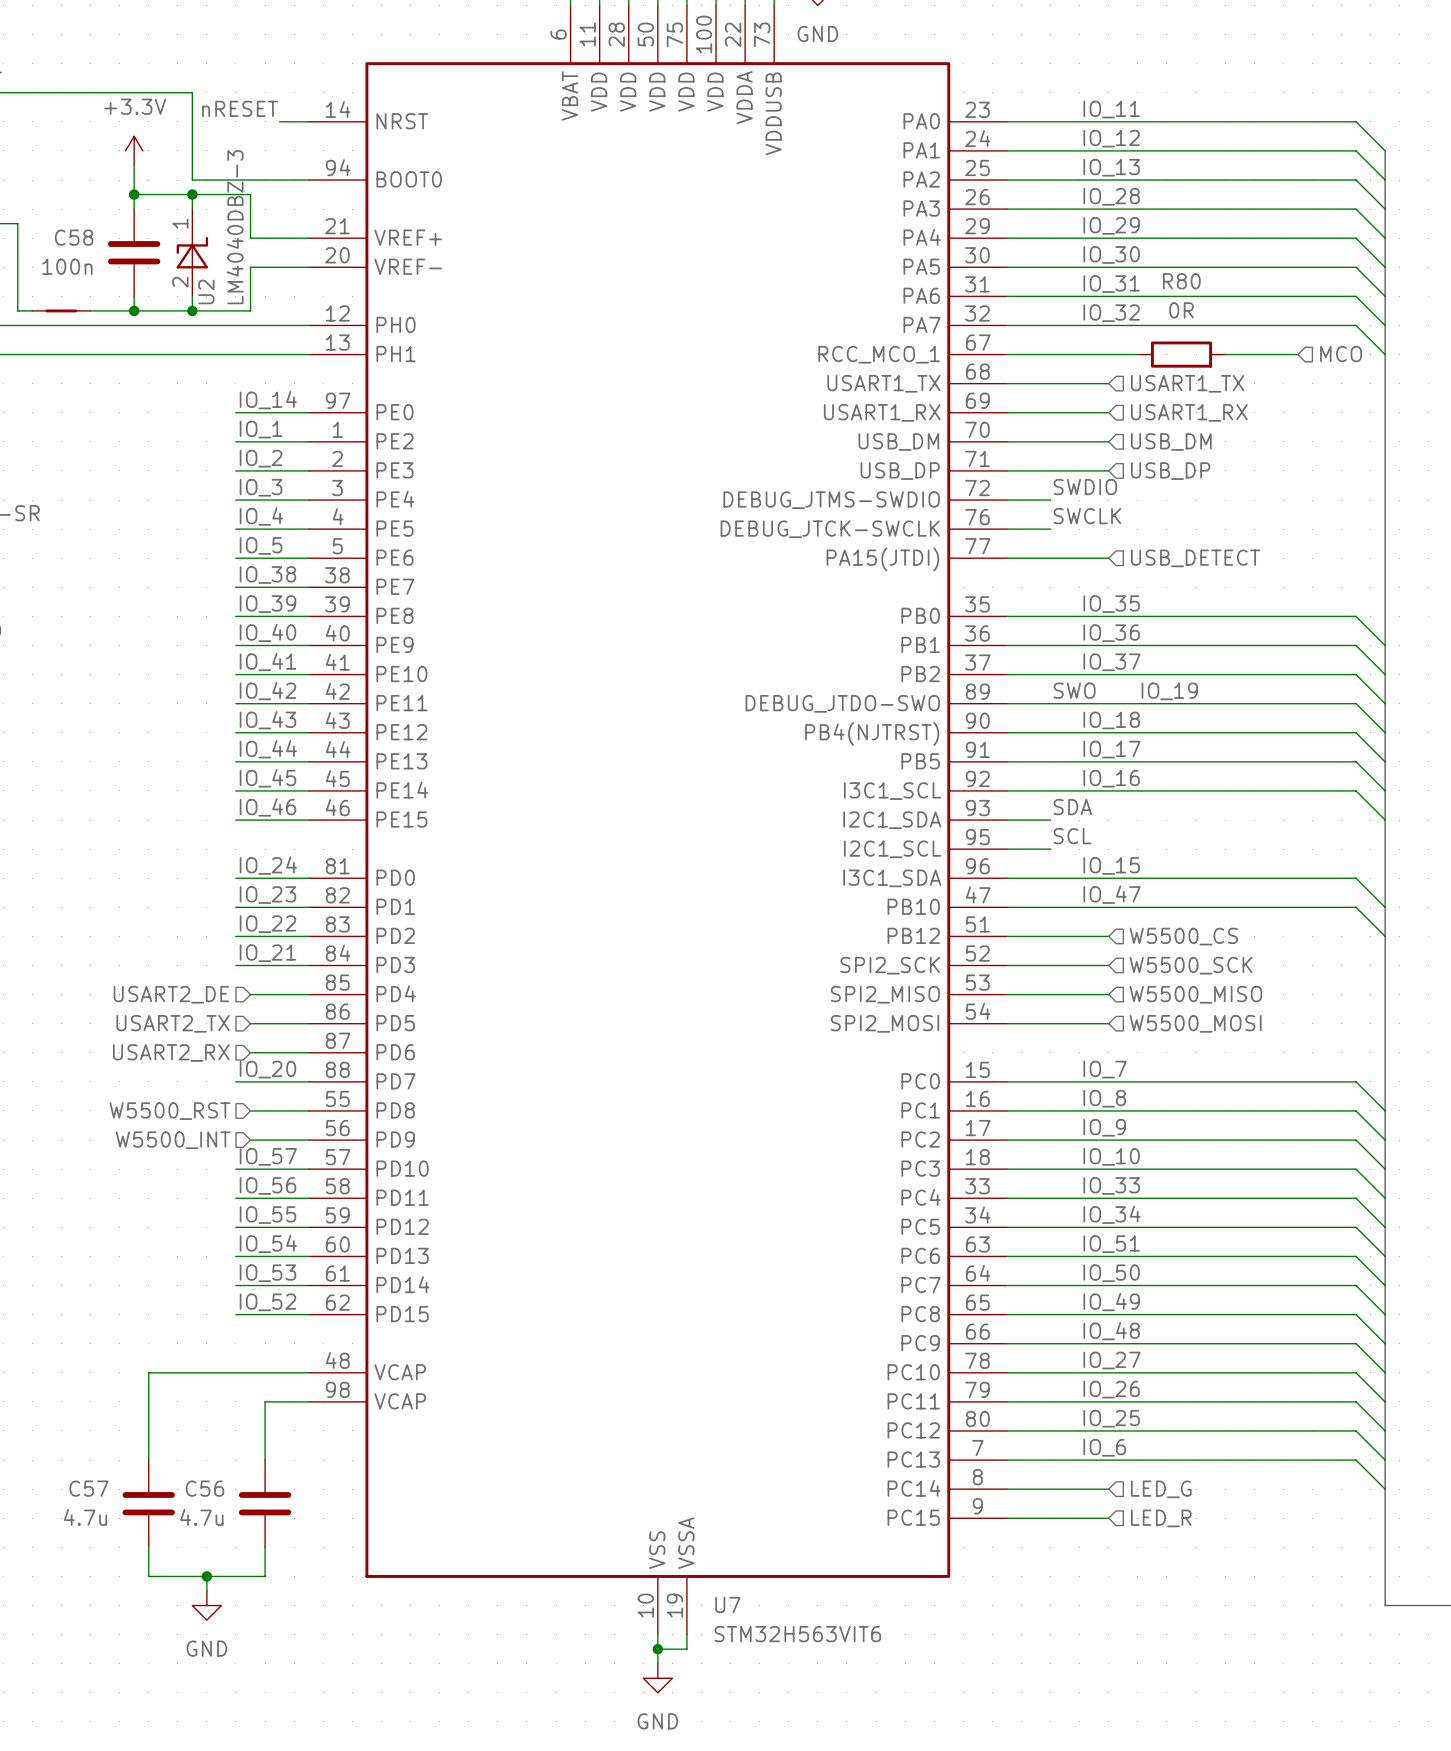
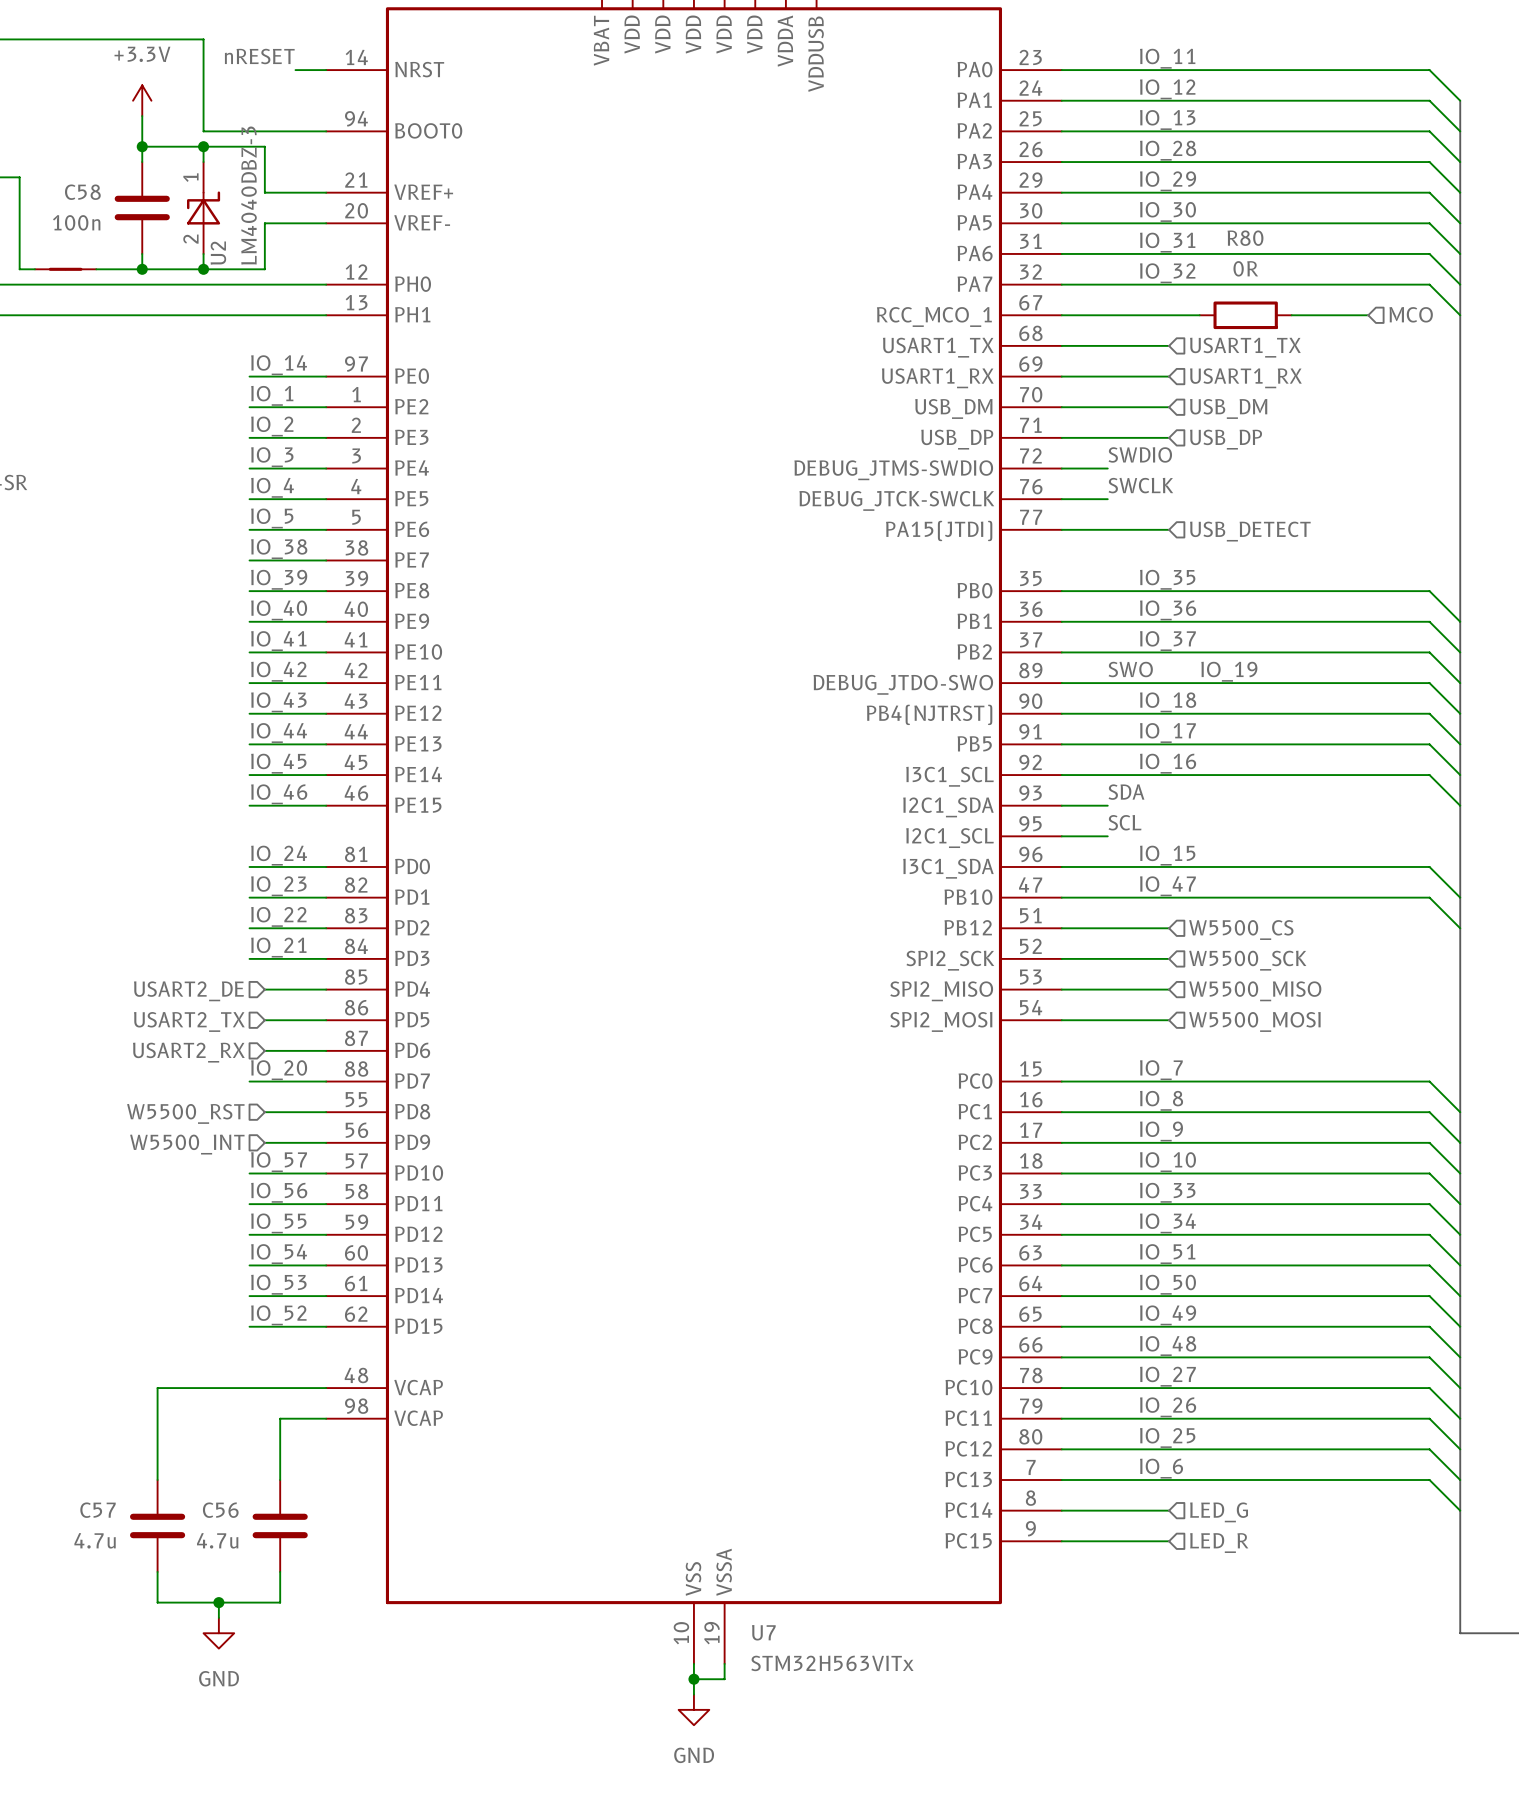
U7 value: STM32H563VIT6 (797, 1634) -> STM32H563VITx (832, 1663)

